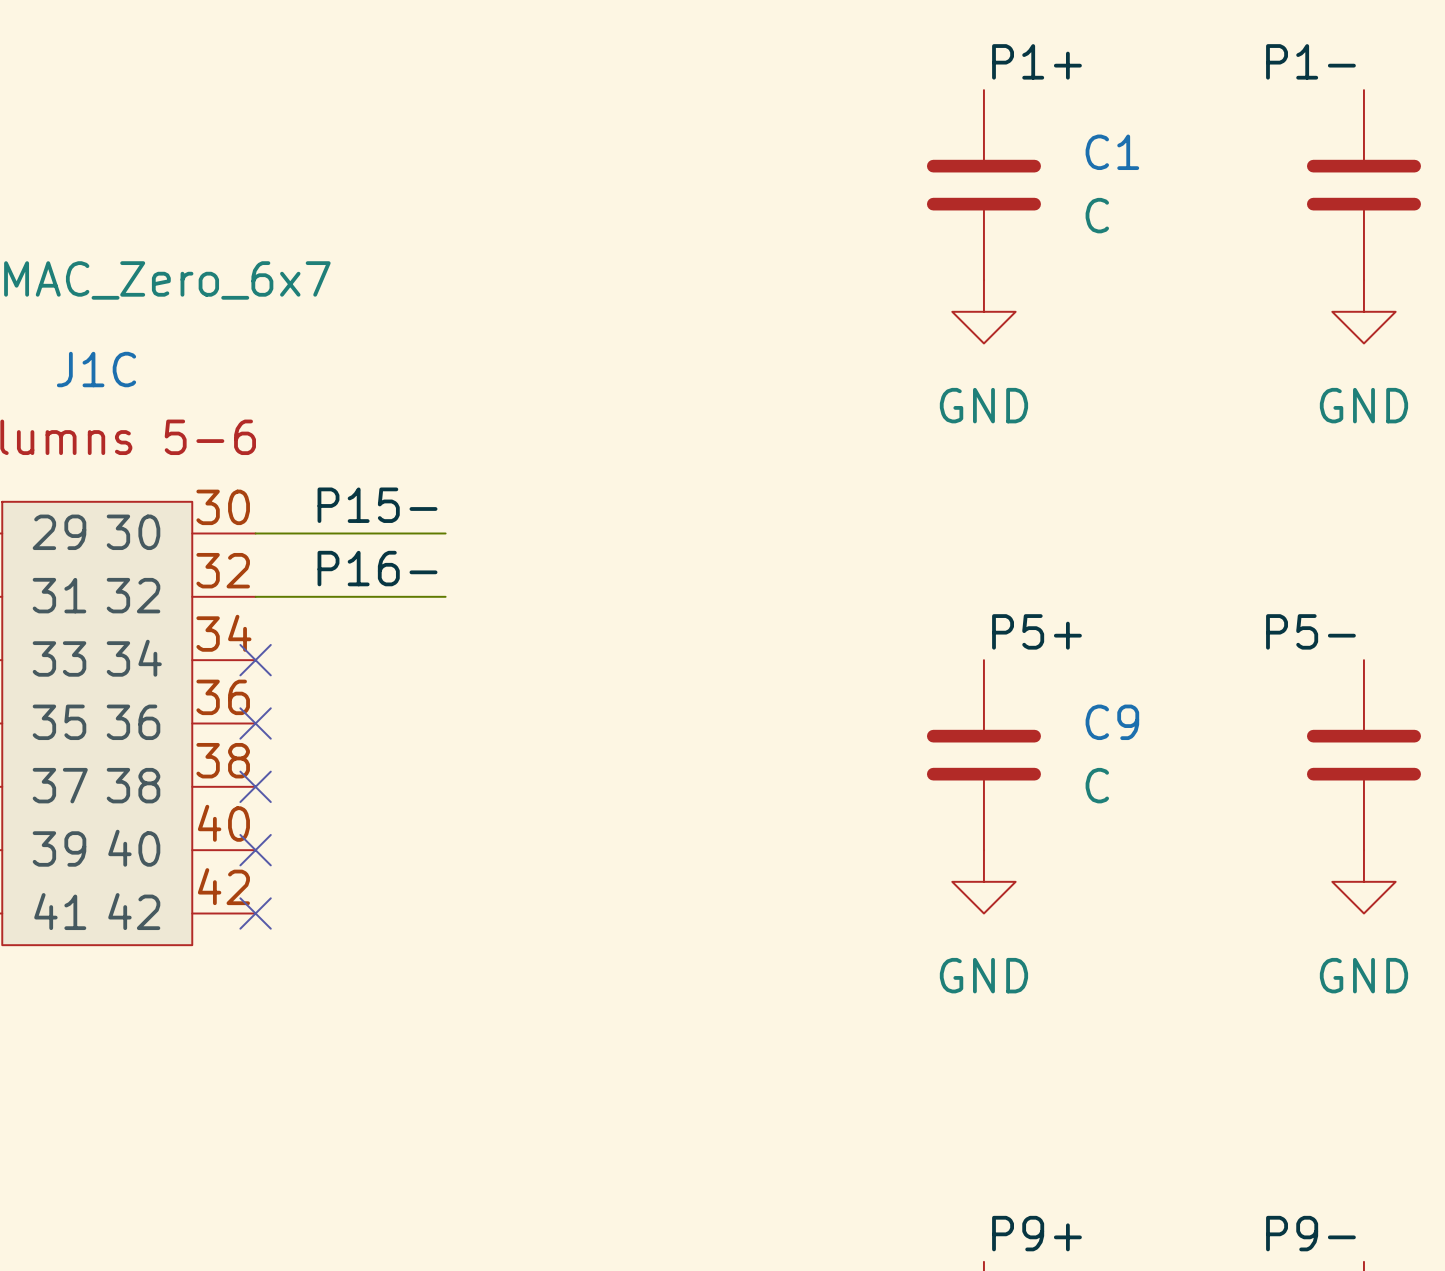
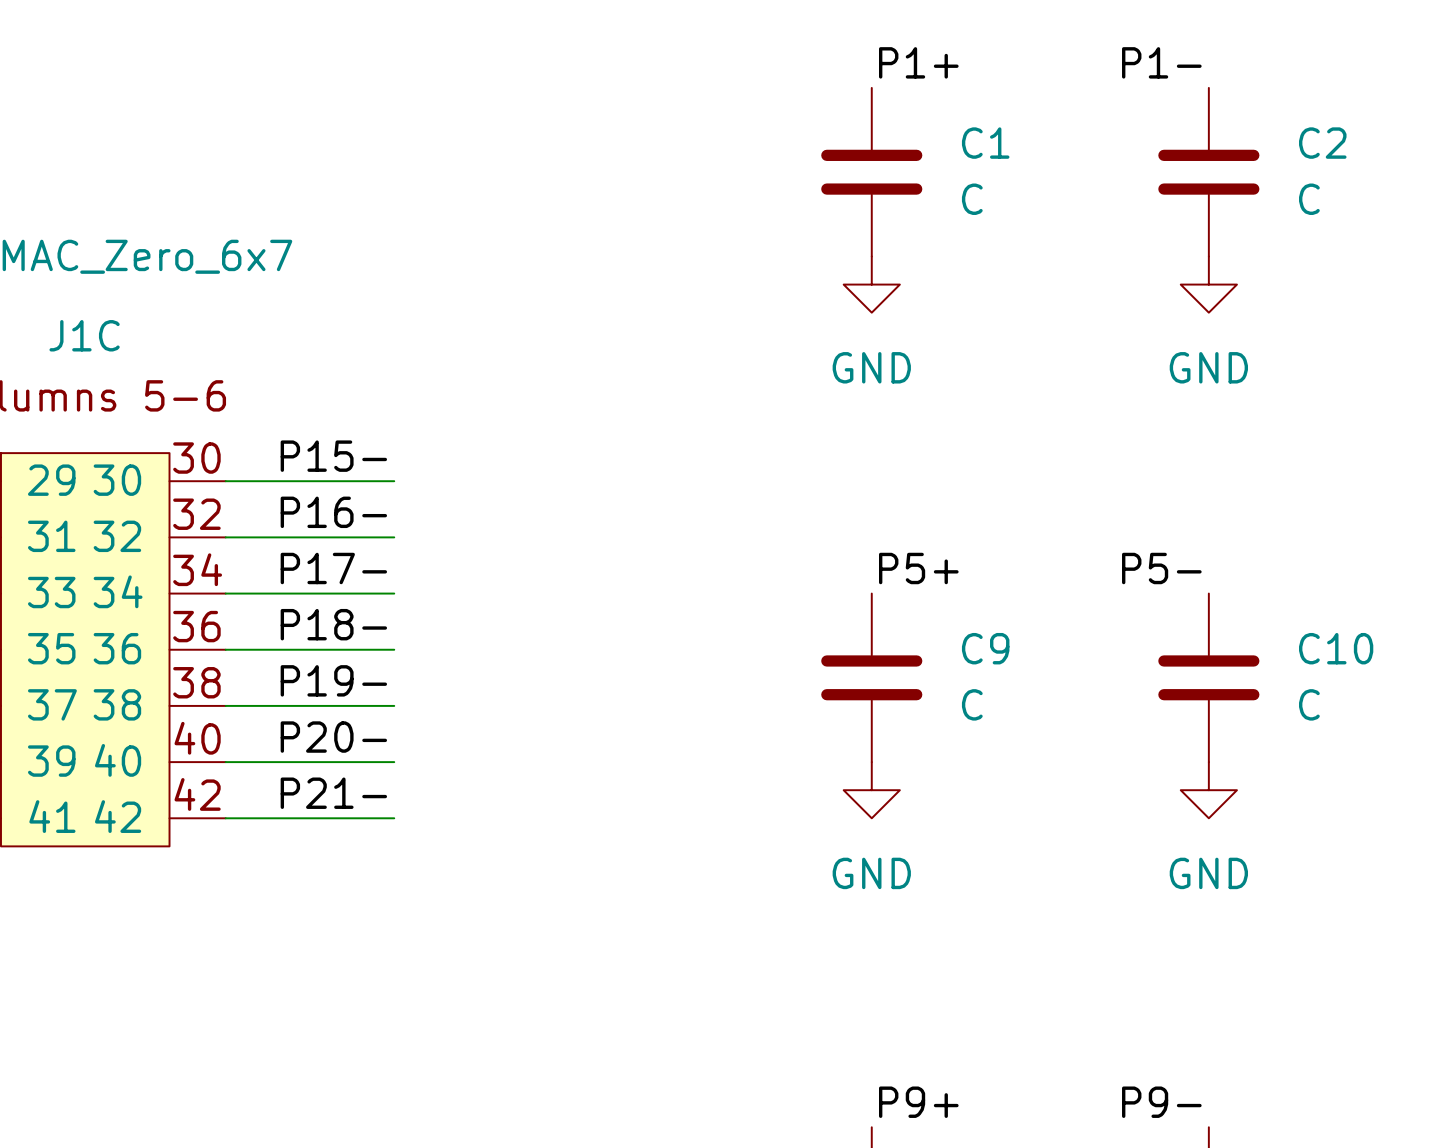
label: none -> P17- (333, 568)
wire: none -> (225, 593) (394, 593)
no-connect mark: (255, 660) -> none
label: none -> P18- (333, 624)
wire: none -> (225, 649) (394, 649)
no-connect mark: (255, 723) -> none
label: none -> P19- (333, 680)
wire: none -> (225, 705) (394, 705)
no-connect mark: (255, 786) -> none
label: none -> P20- (333, 737)
wire: none -> (225, 762) (394, 762)
no-connect mark: (255, 850) -> none
label: none -> P21- (333, 793)
wire: none -> (225, 818) (394, 818)
no-connect mark: (255, 913) -> none

